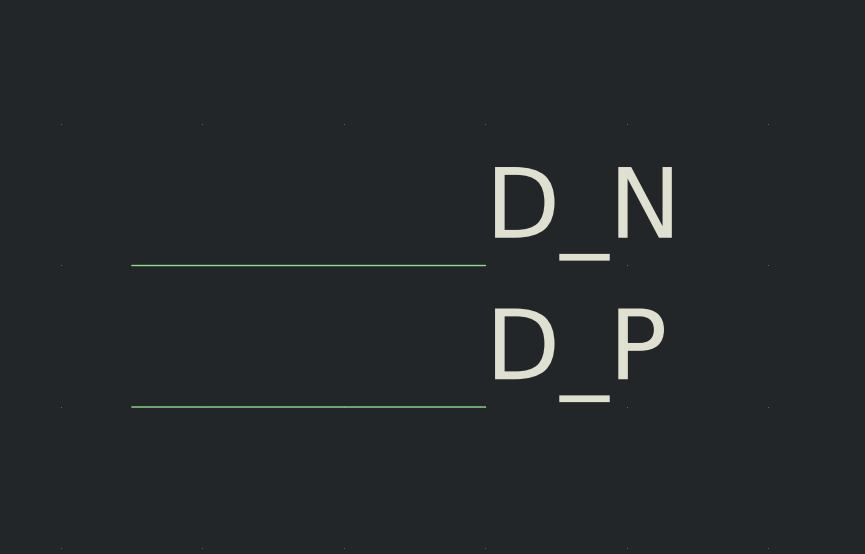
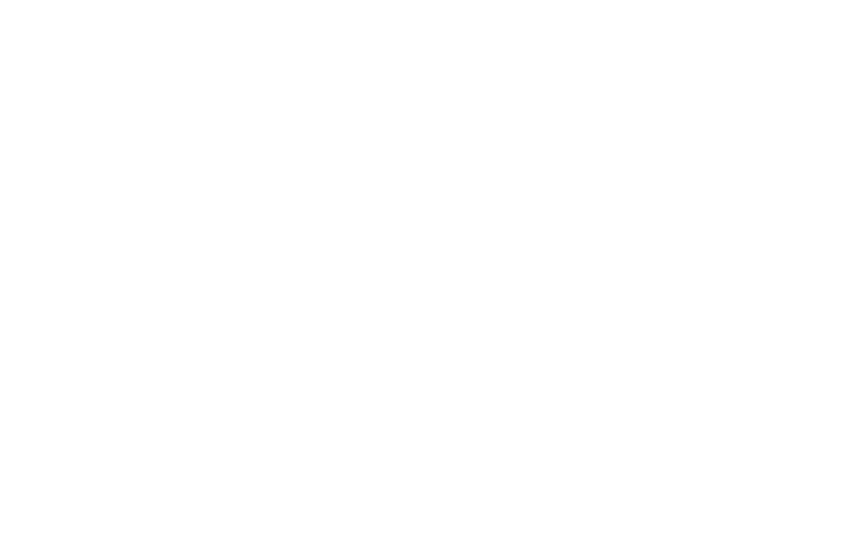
label: D_N (583, 213) -> none
wire: (131, 265) (485, 265) -> none
label: D_P (579, 355) -> none
wire: (131, 407) (485, 407) -> none

